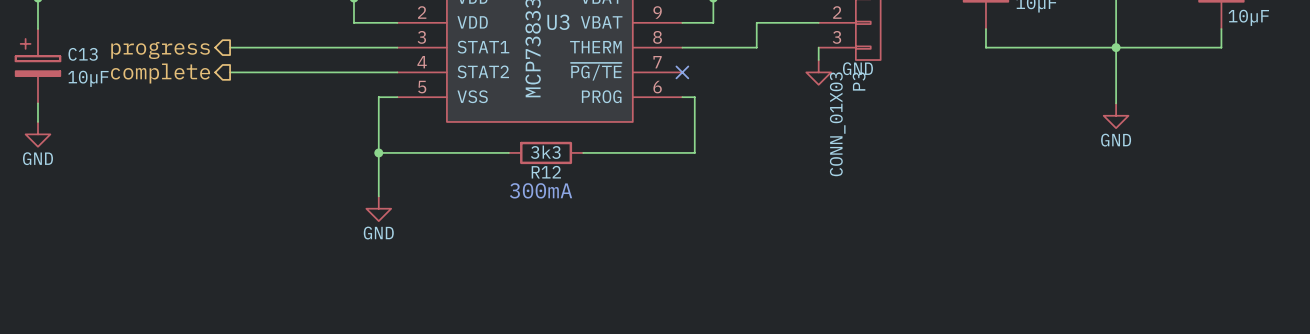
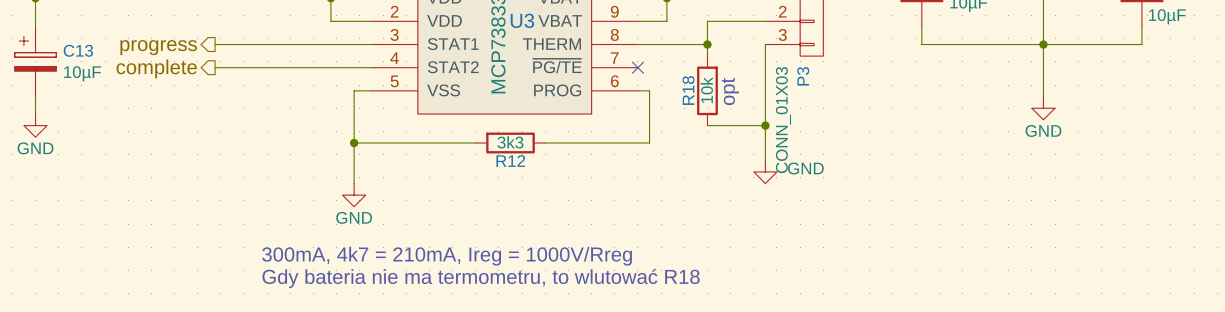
wire: none -> (707, 44) (707, 56)
junction: none -> (707, 44)
wire: none -> (765, 56) (765, 160)
power symbol position: GND (818, 72) -> GND (765, 171)
text: none -> opt (730, 91)
R18: none -> 10k (707, 90)
wire: none -> (707, 125) (765, 125)
junction: none -> (765, 125)
text: 300mA (541, 190) -> none
text: none -> 300mA, 4k7 = 210mA, Ireg = 1000V/Rreg (447, 256)
text: none -> Gdy bateria nie ma termometru, to wlutować R18 (481, 278)

